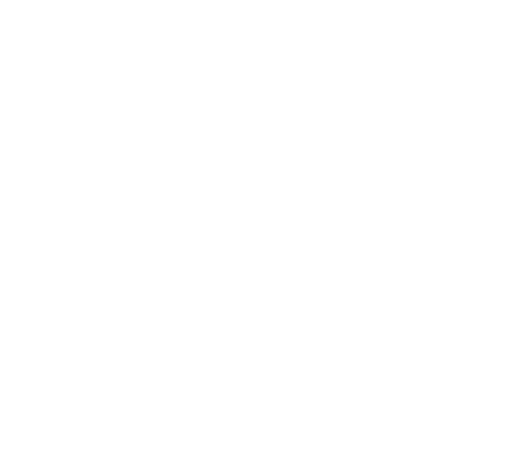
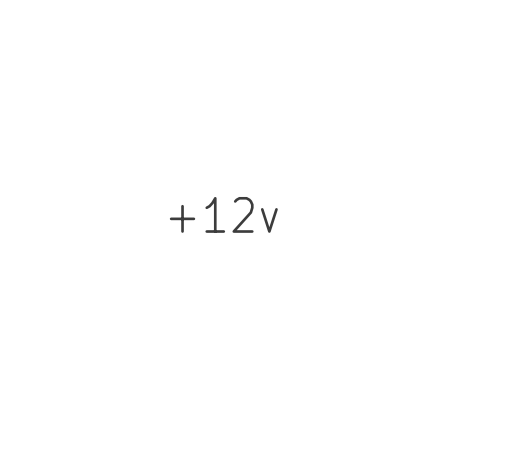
text: none -> +12v (223, 214)

